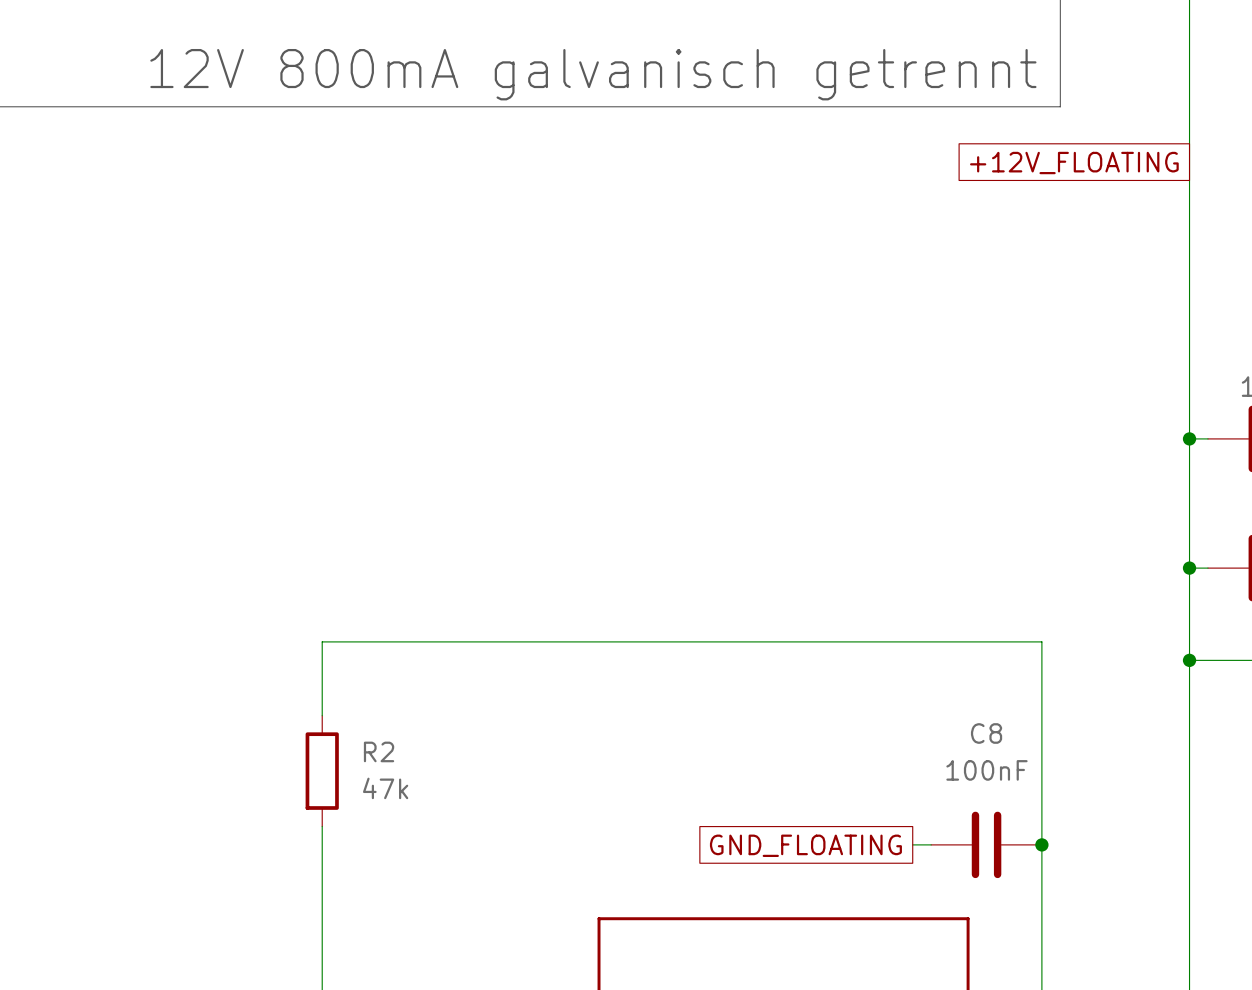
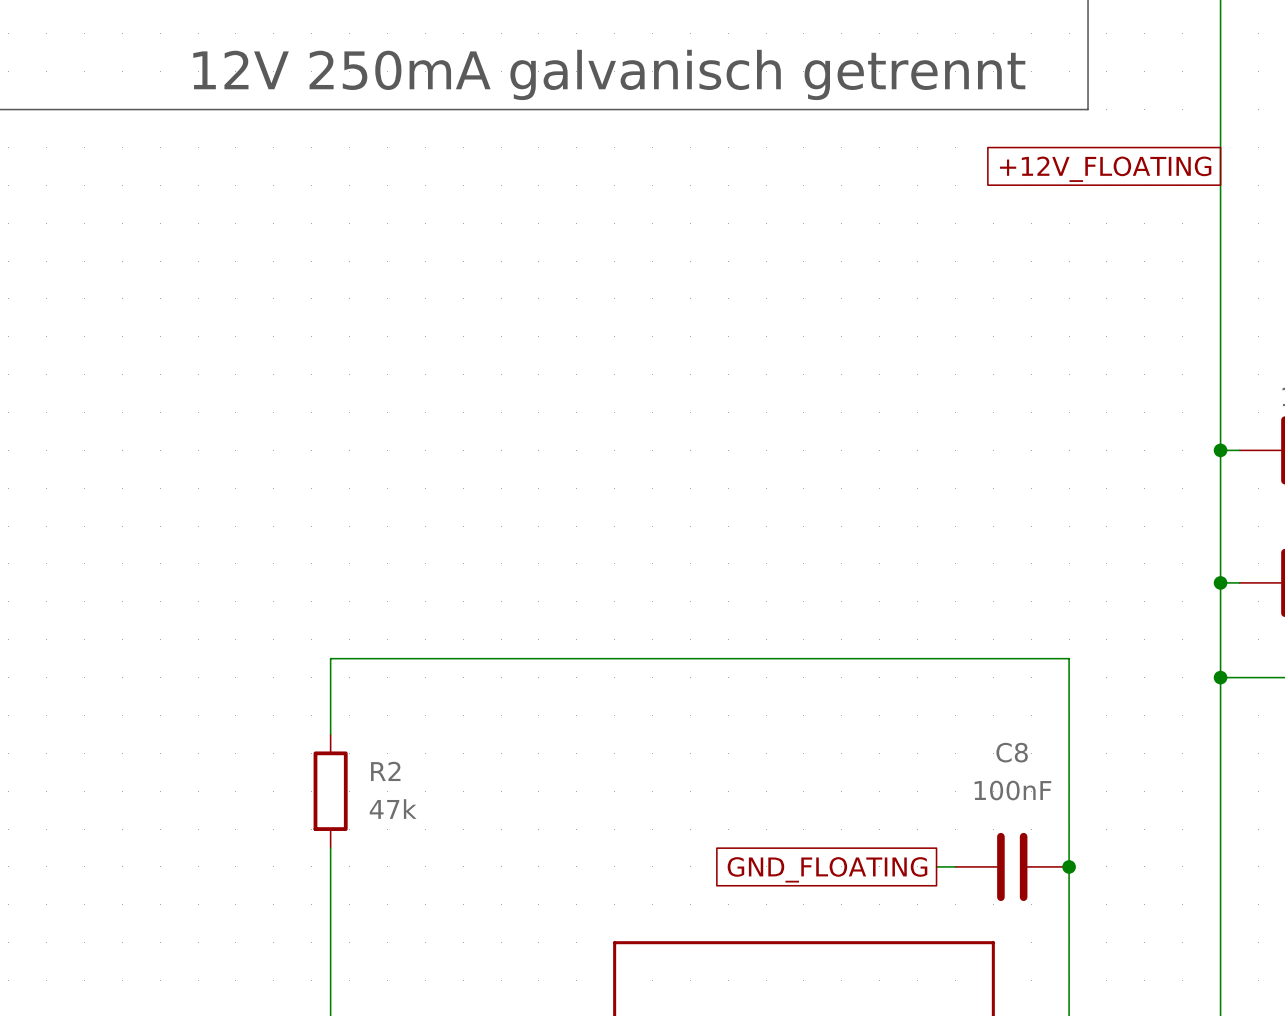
text: 12V 800mA galvanisch getrennt (593, 74) -> 12V 250mA galvanisch getrennt (609, 74)

